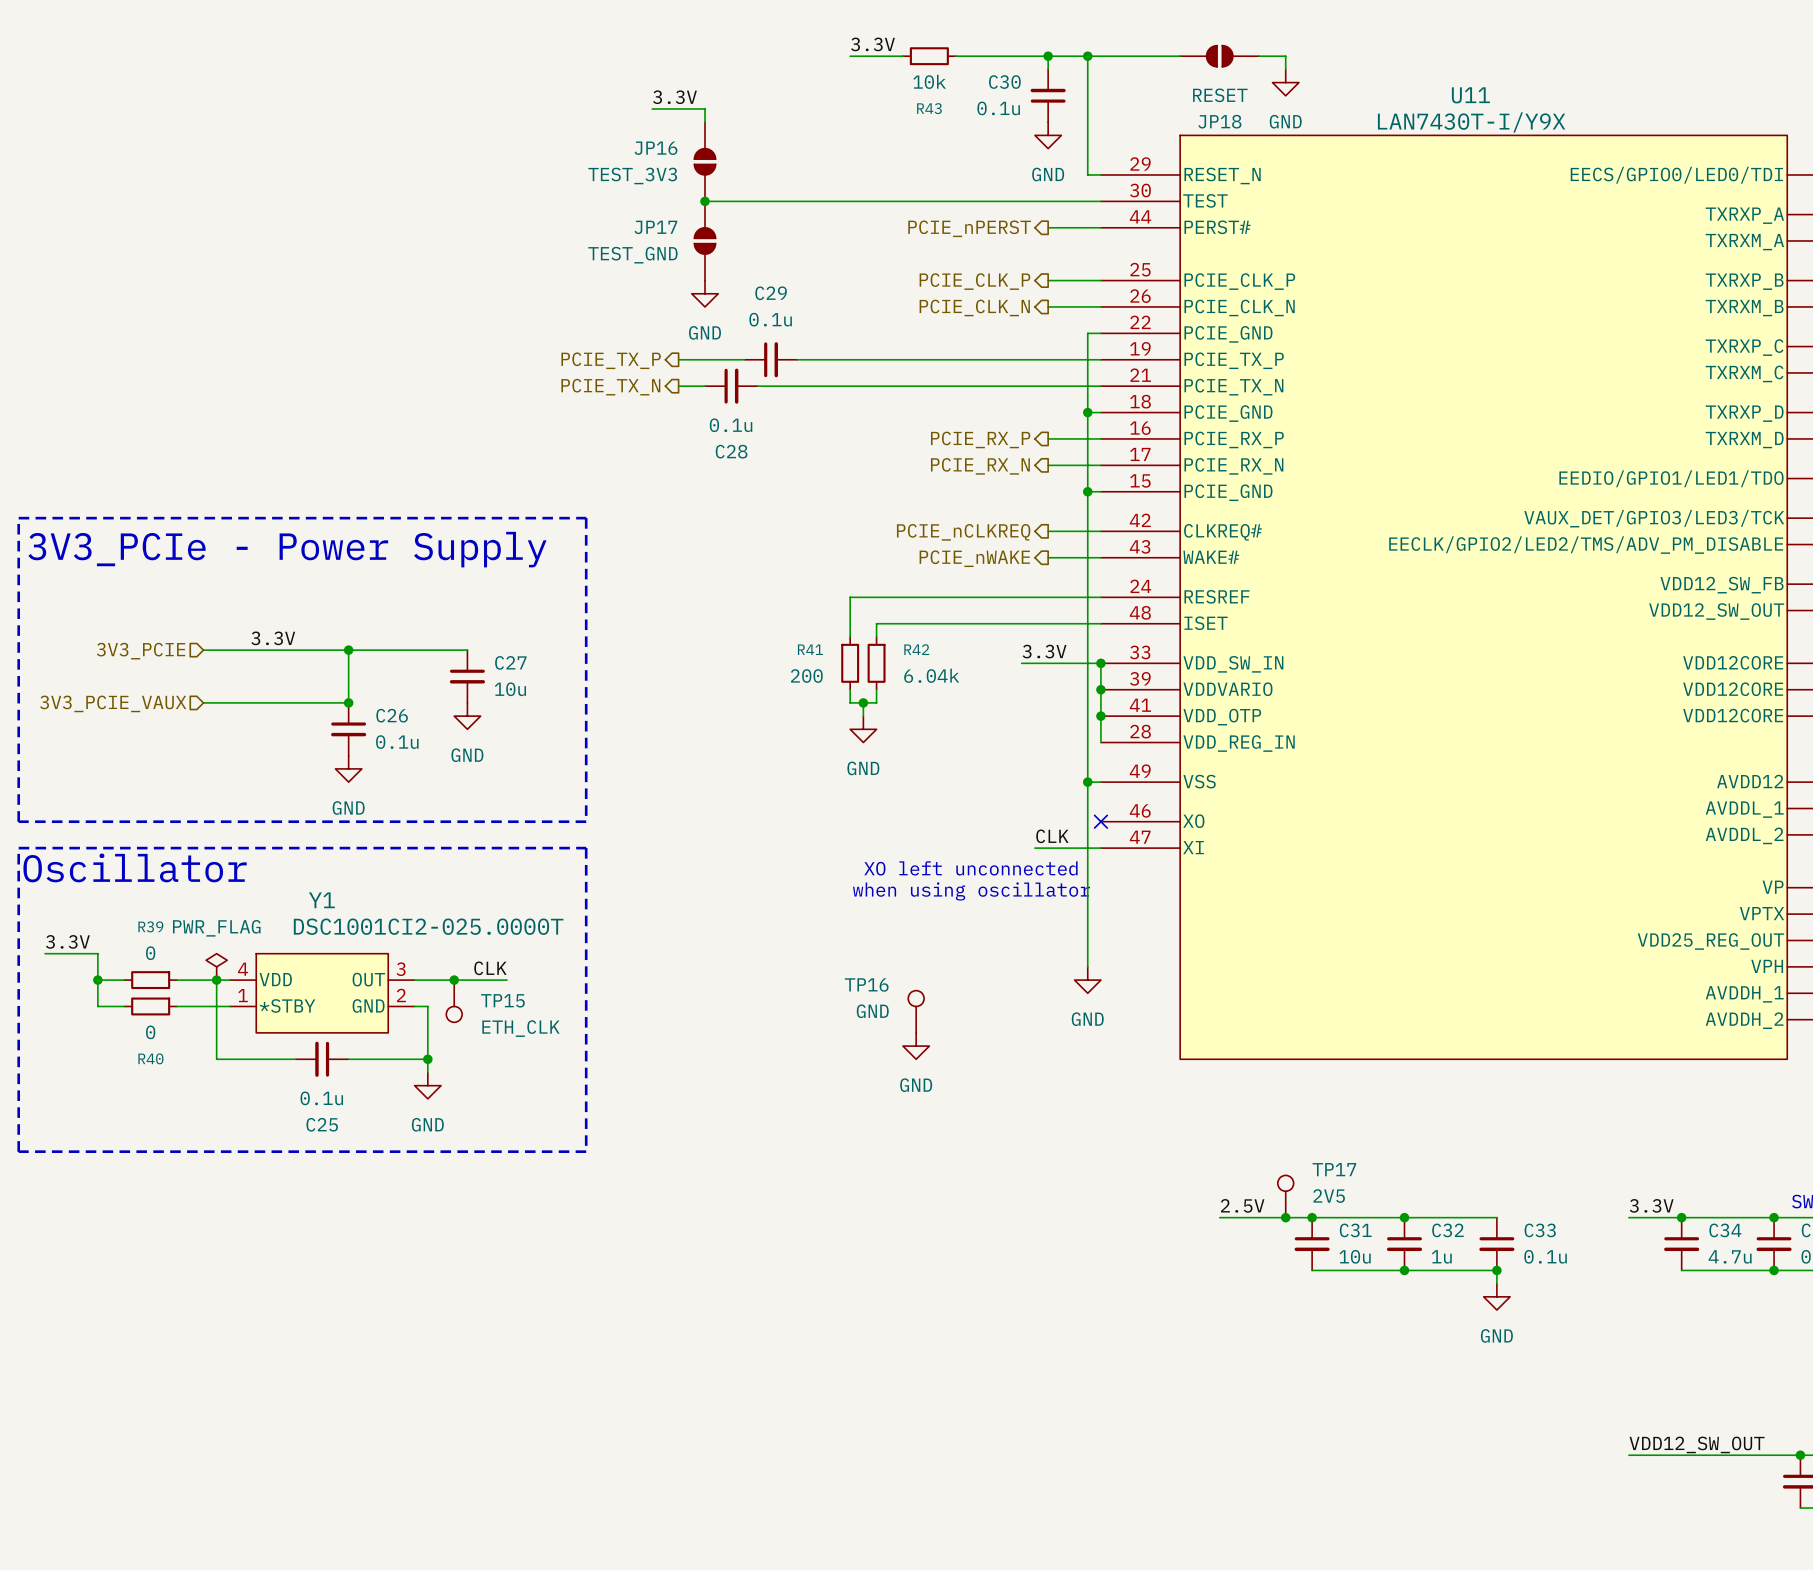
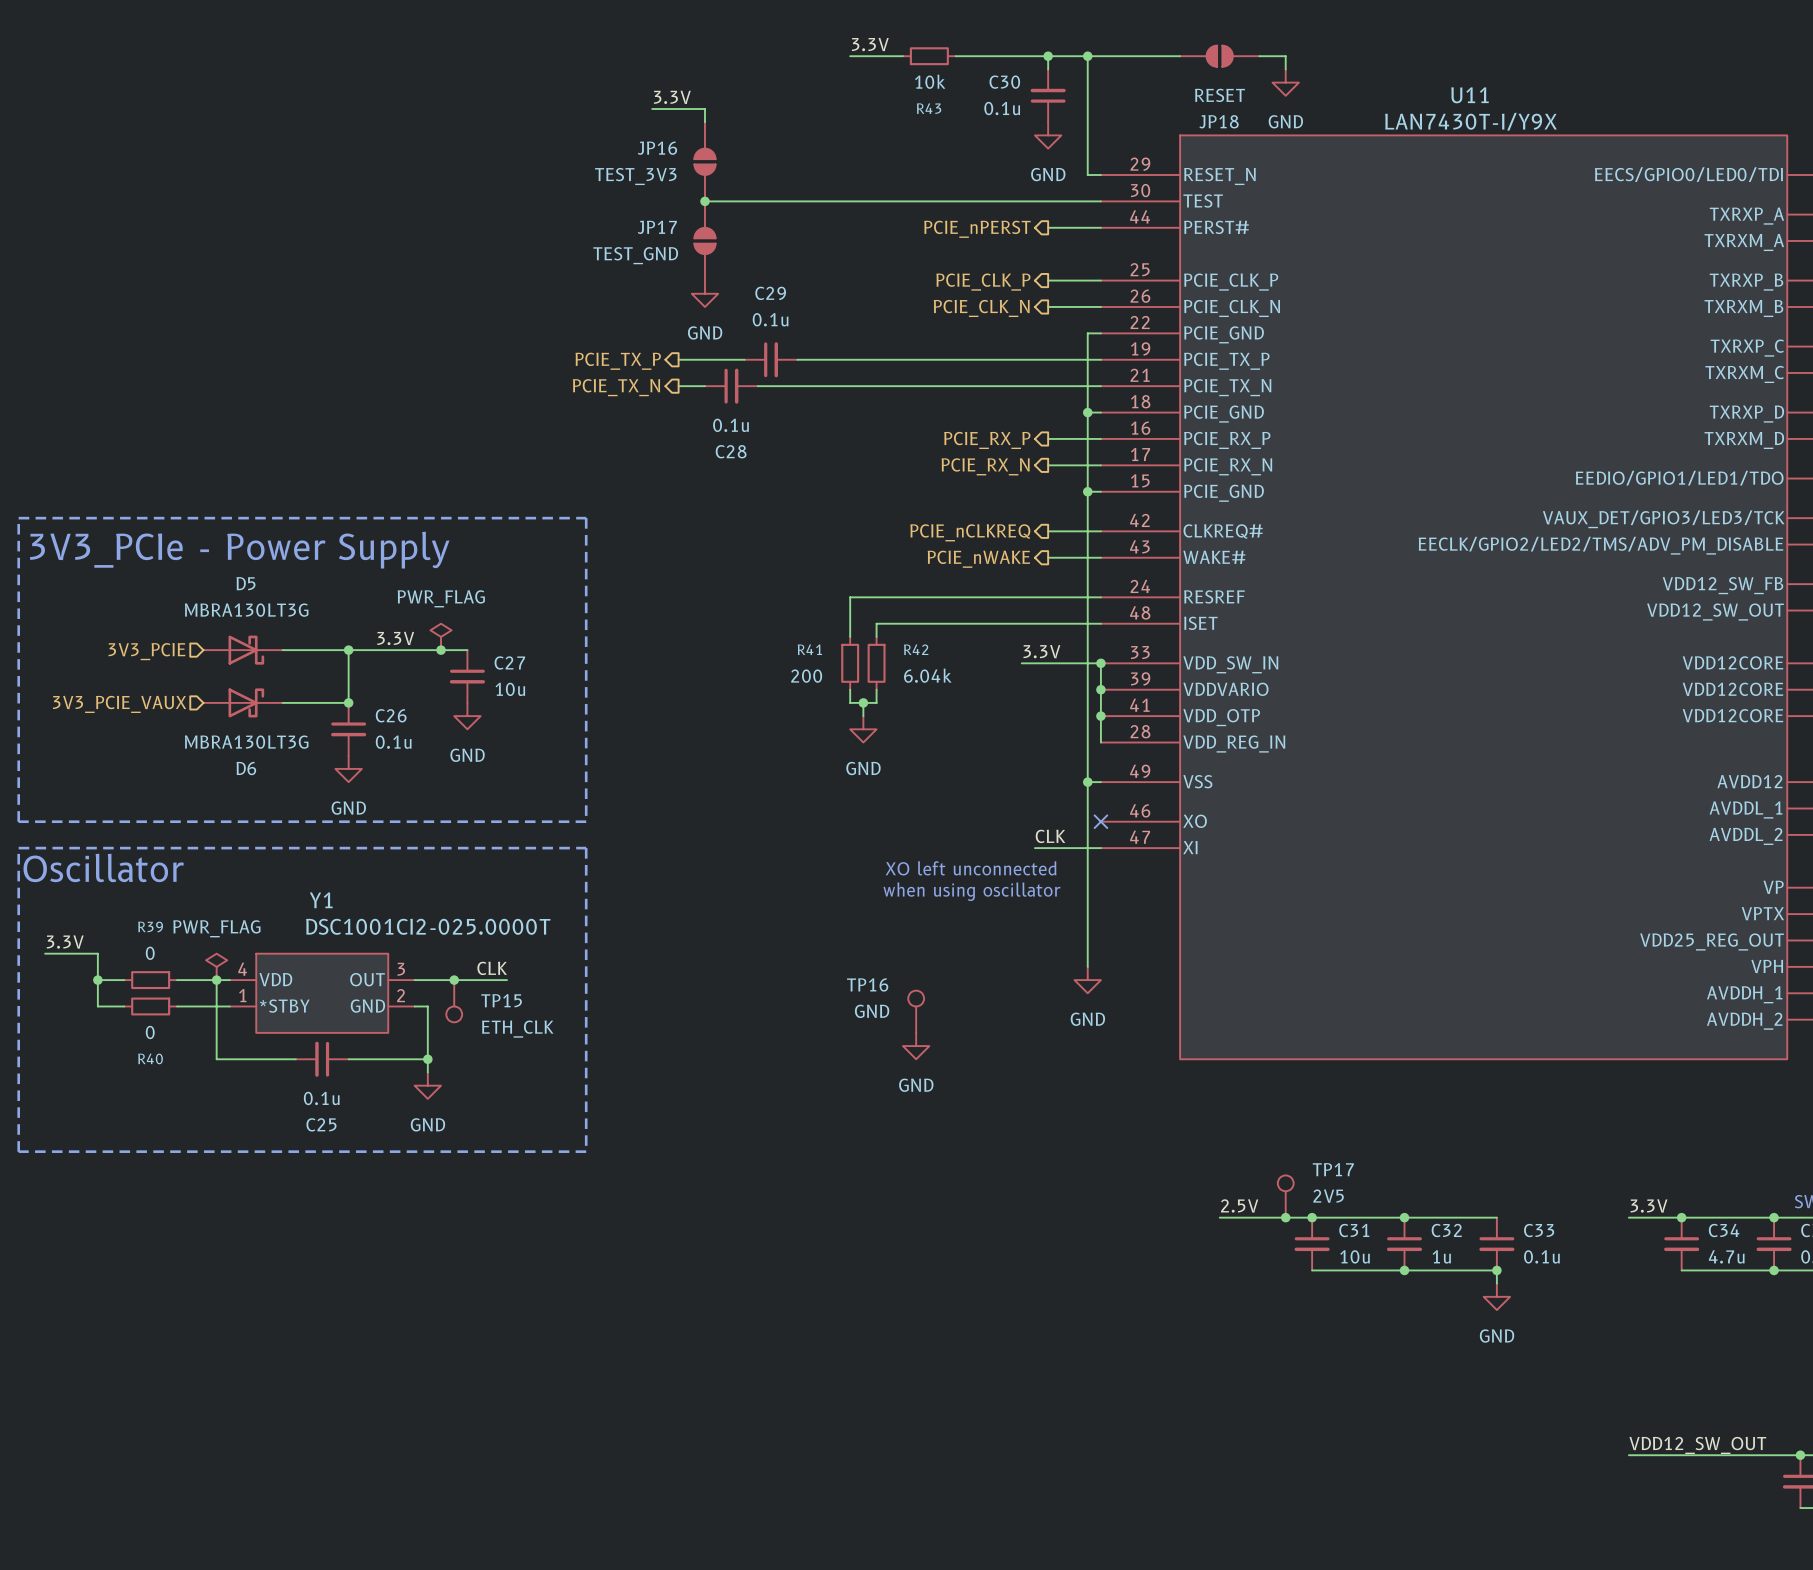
power symbol: none -> PWR_FLAG (441, 636)
label position: 3.3V (273, 638) -> 3.3V (395, 638)
D5: none -> MBRA130LT3G (243, 650)
junction: none -> (441, 650)
D6: none -> MBRA130LT3G (243, 702)

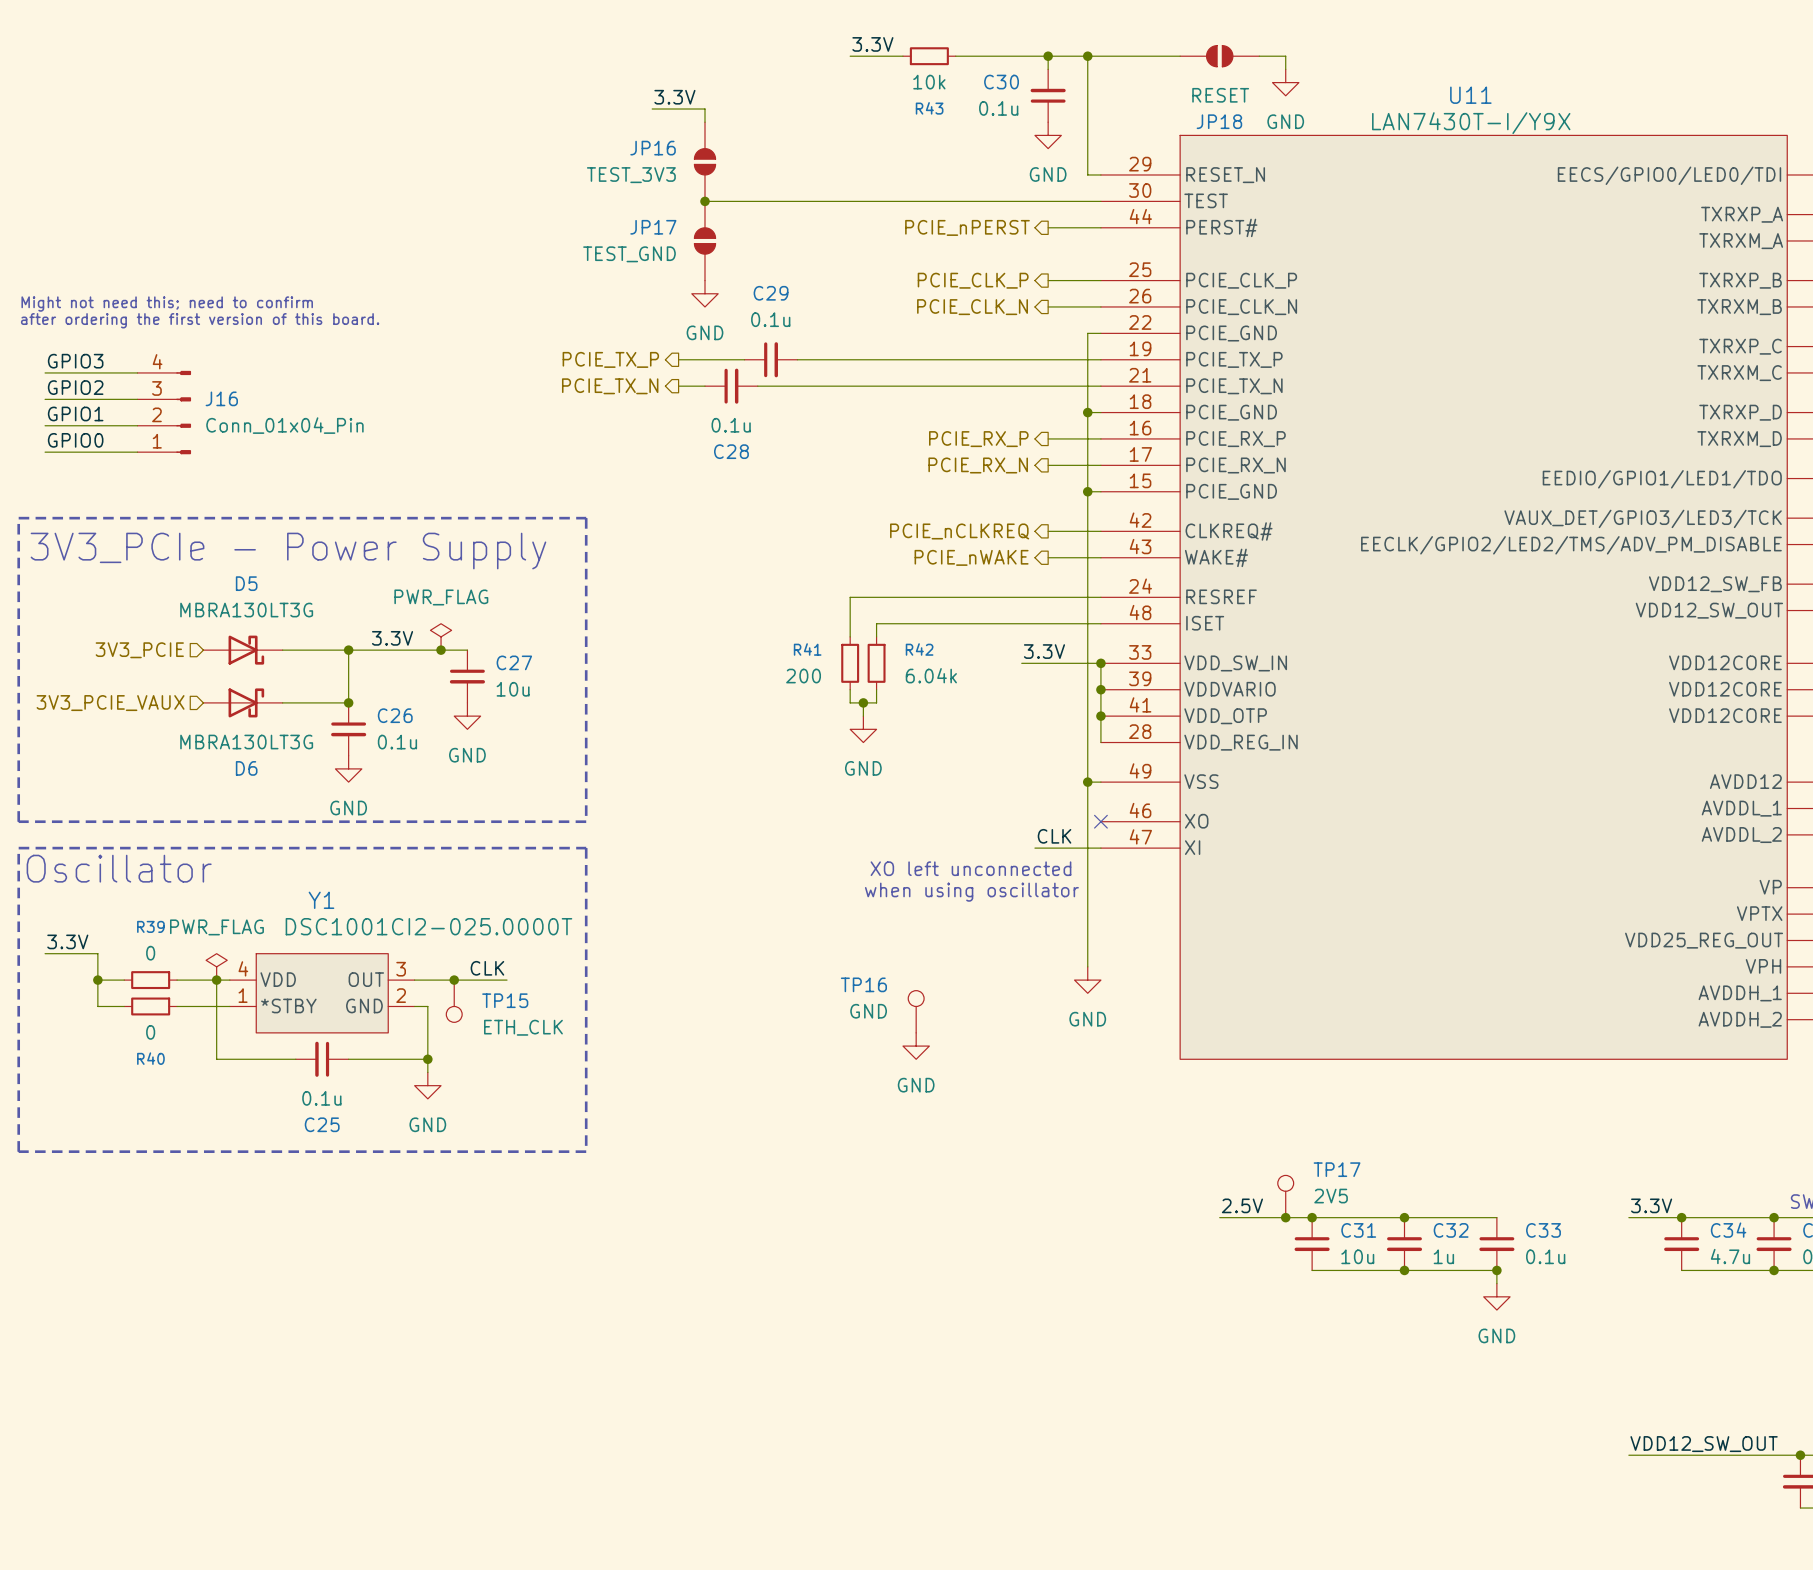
text: none -> Might not need this; need to confirm (167, 304)
text: none -> after ordering the first version of this board. (200, 320)
label: none -> GPIO3 (75, 361)
wire: none -> (45, 372) (137, 372)
label: none -> GPIO2 (75, 387)
wire: none -> (45, 399) (137, 399)
J16: none -> Conn_01x04_Pin (164, 412)
label: none -> GPIO1 (75, 413)
wire: none -> (45, 425) (137, 425)
label: none -> GPIO0 (75, 440)
wire: none -> (45, 452) (137, 452)

